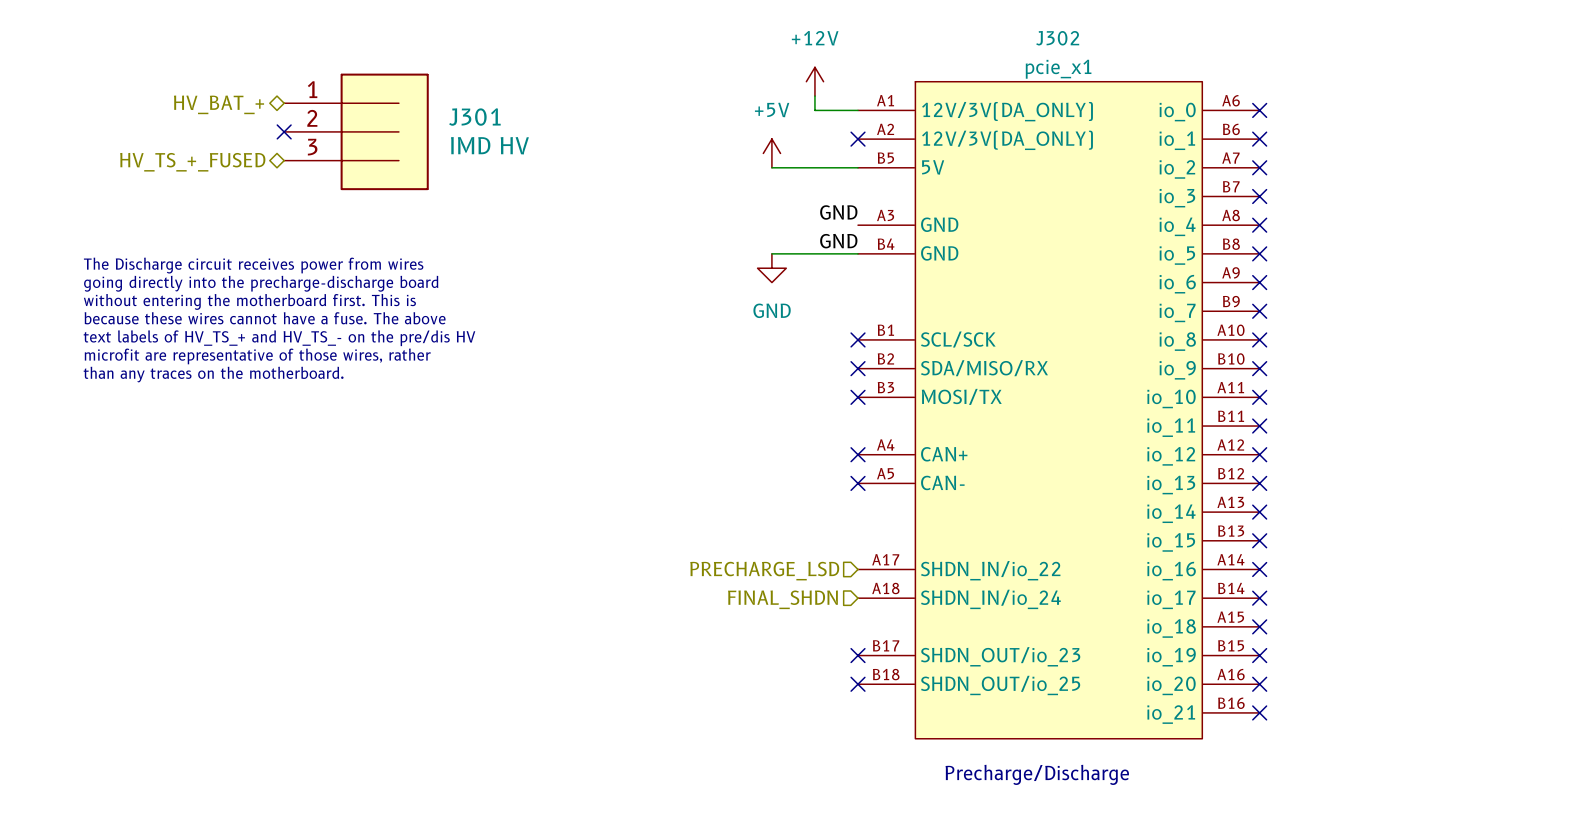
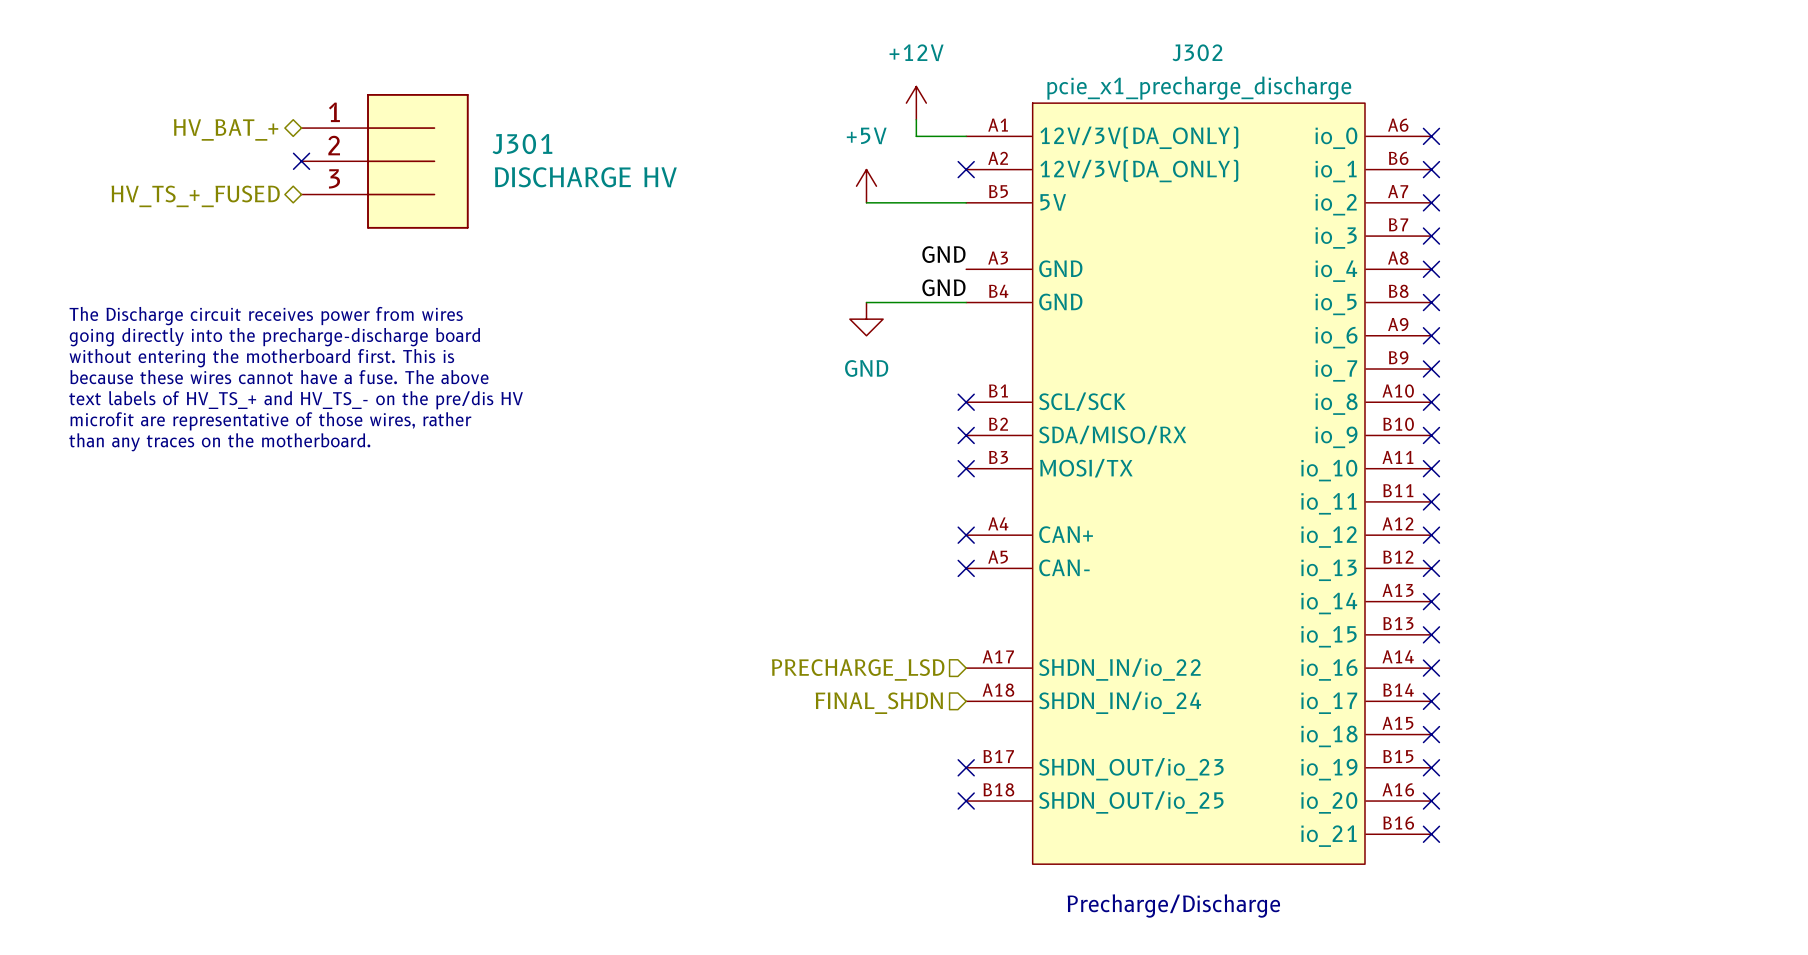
J302 value: pcie_x1 (1058, 69) -> pcie_x1_precharge_discharge (1199, 88)
J301 value: IMD HV (489, 145) -> DISCHARGE HV (585, 177)

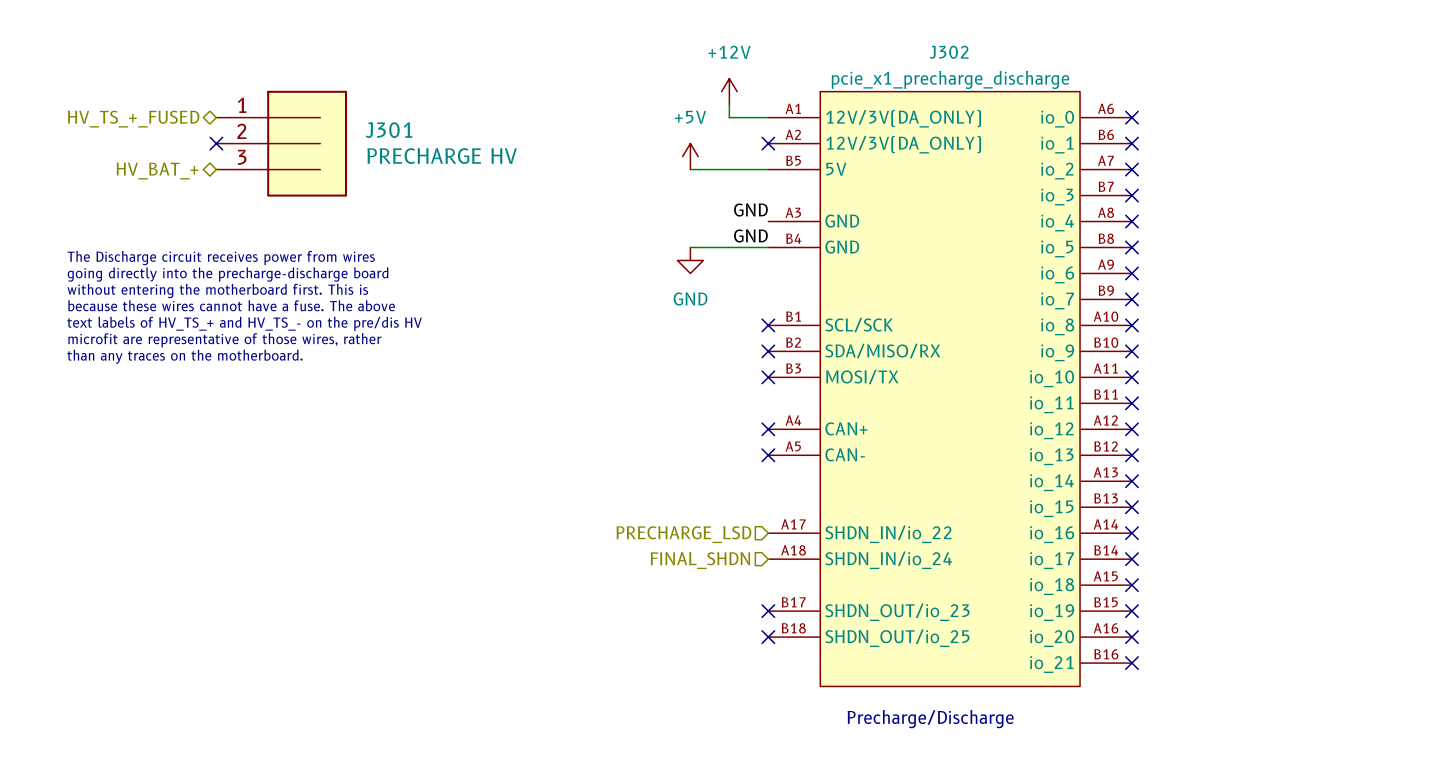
hierarchical label position: HV_BAT_+ (226, 129) -> HV_BAT_+ (157, 171)
no-connect mark position: (301, 161) -> (216, 143)
J301 position: (385, 161) -> (281, 143)
J301 value: DISCHARGE HV (585, 177) -> PRECHARGE HV (442, 156)
hierarchical label position: HV_TS_+_FUSED (195, 196) -> HV_TS_+_FUSED (133, 119)

